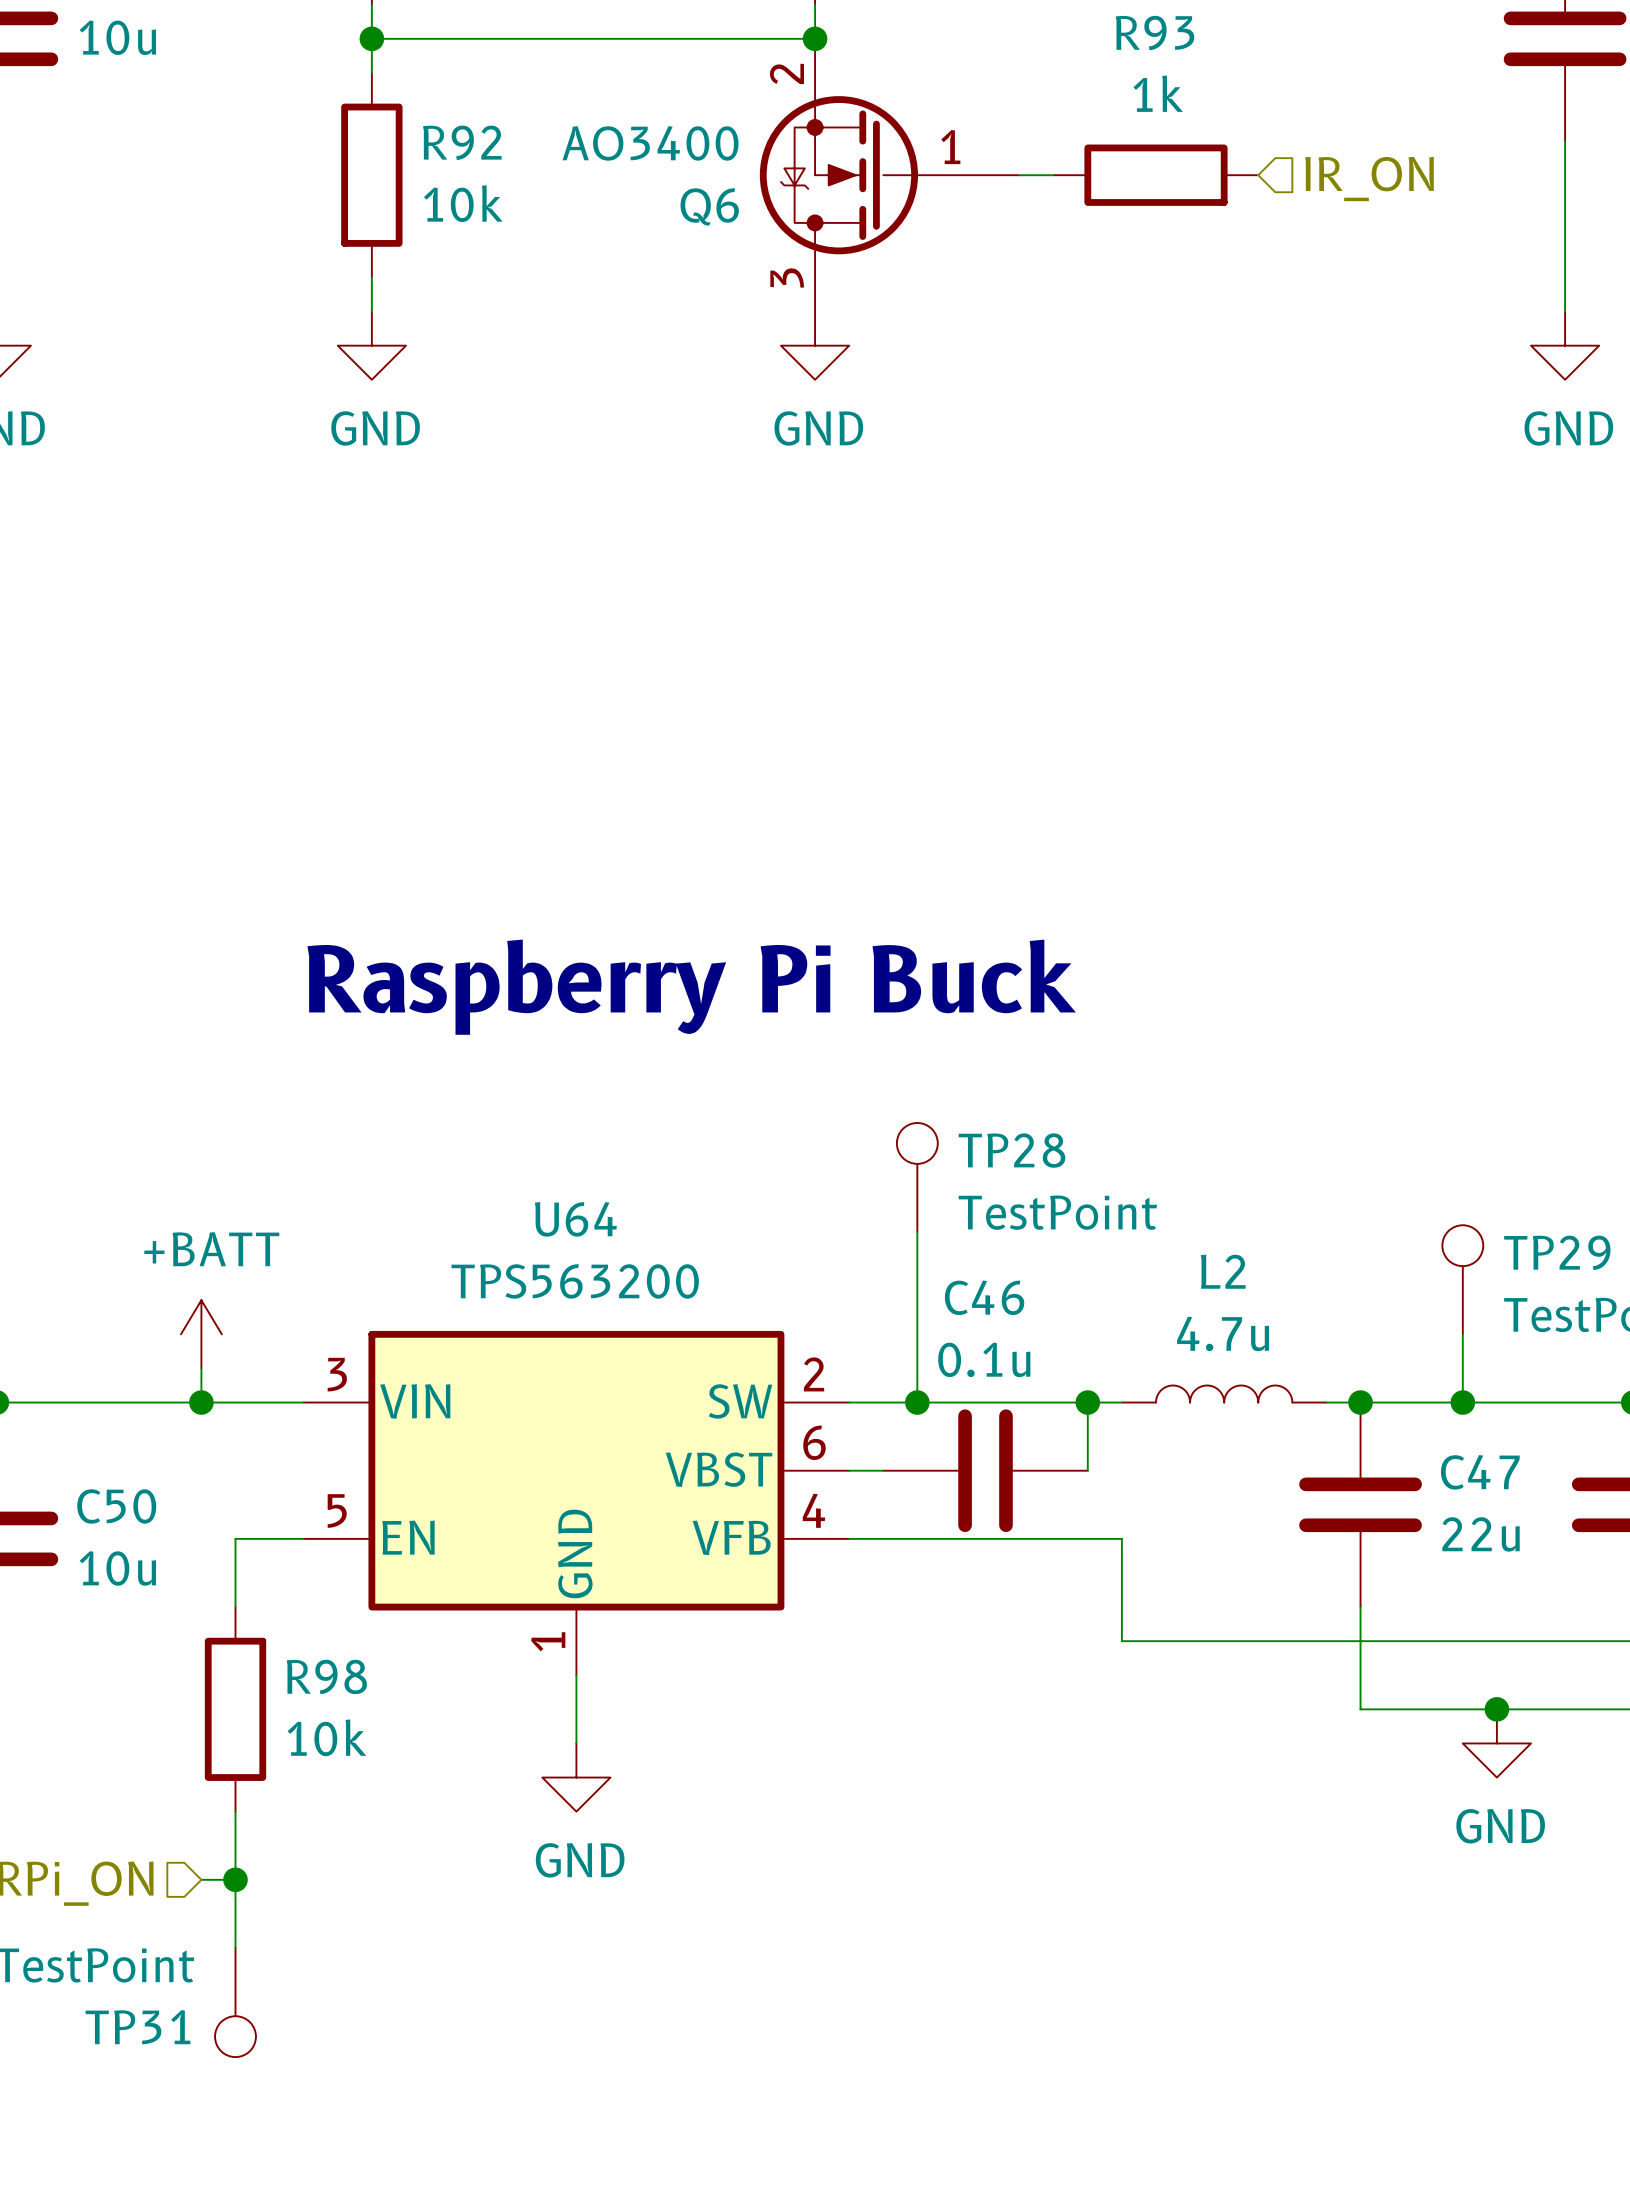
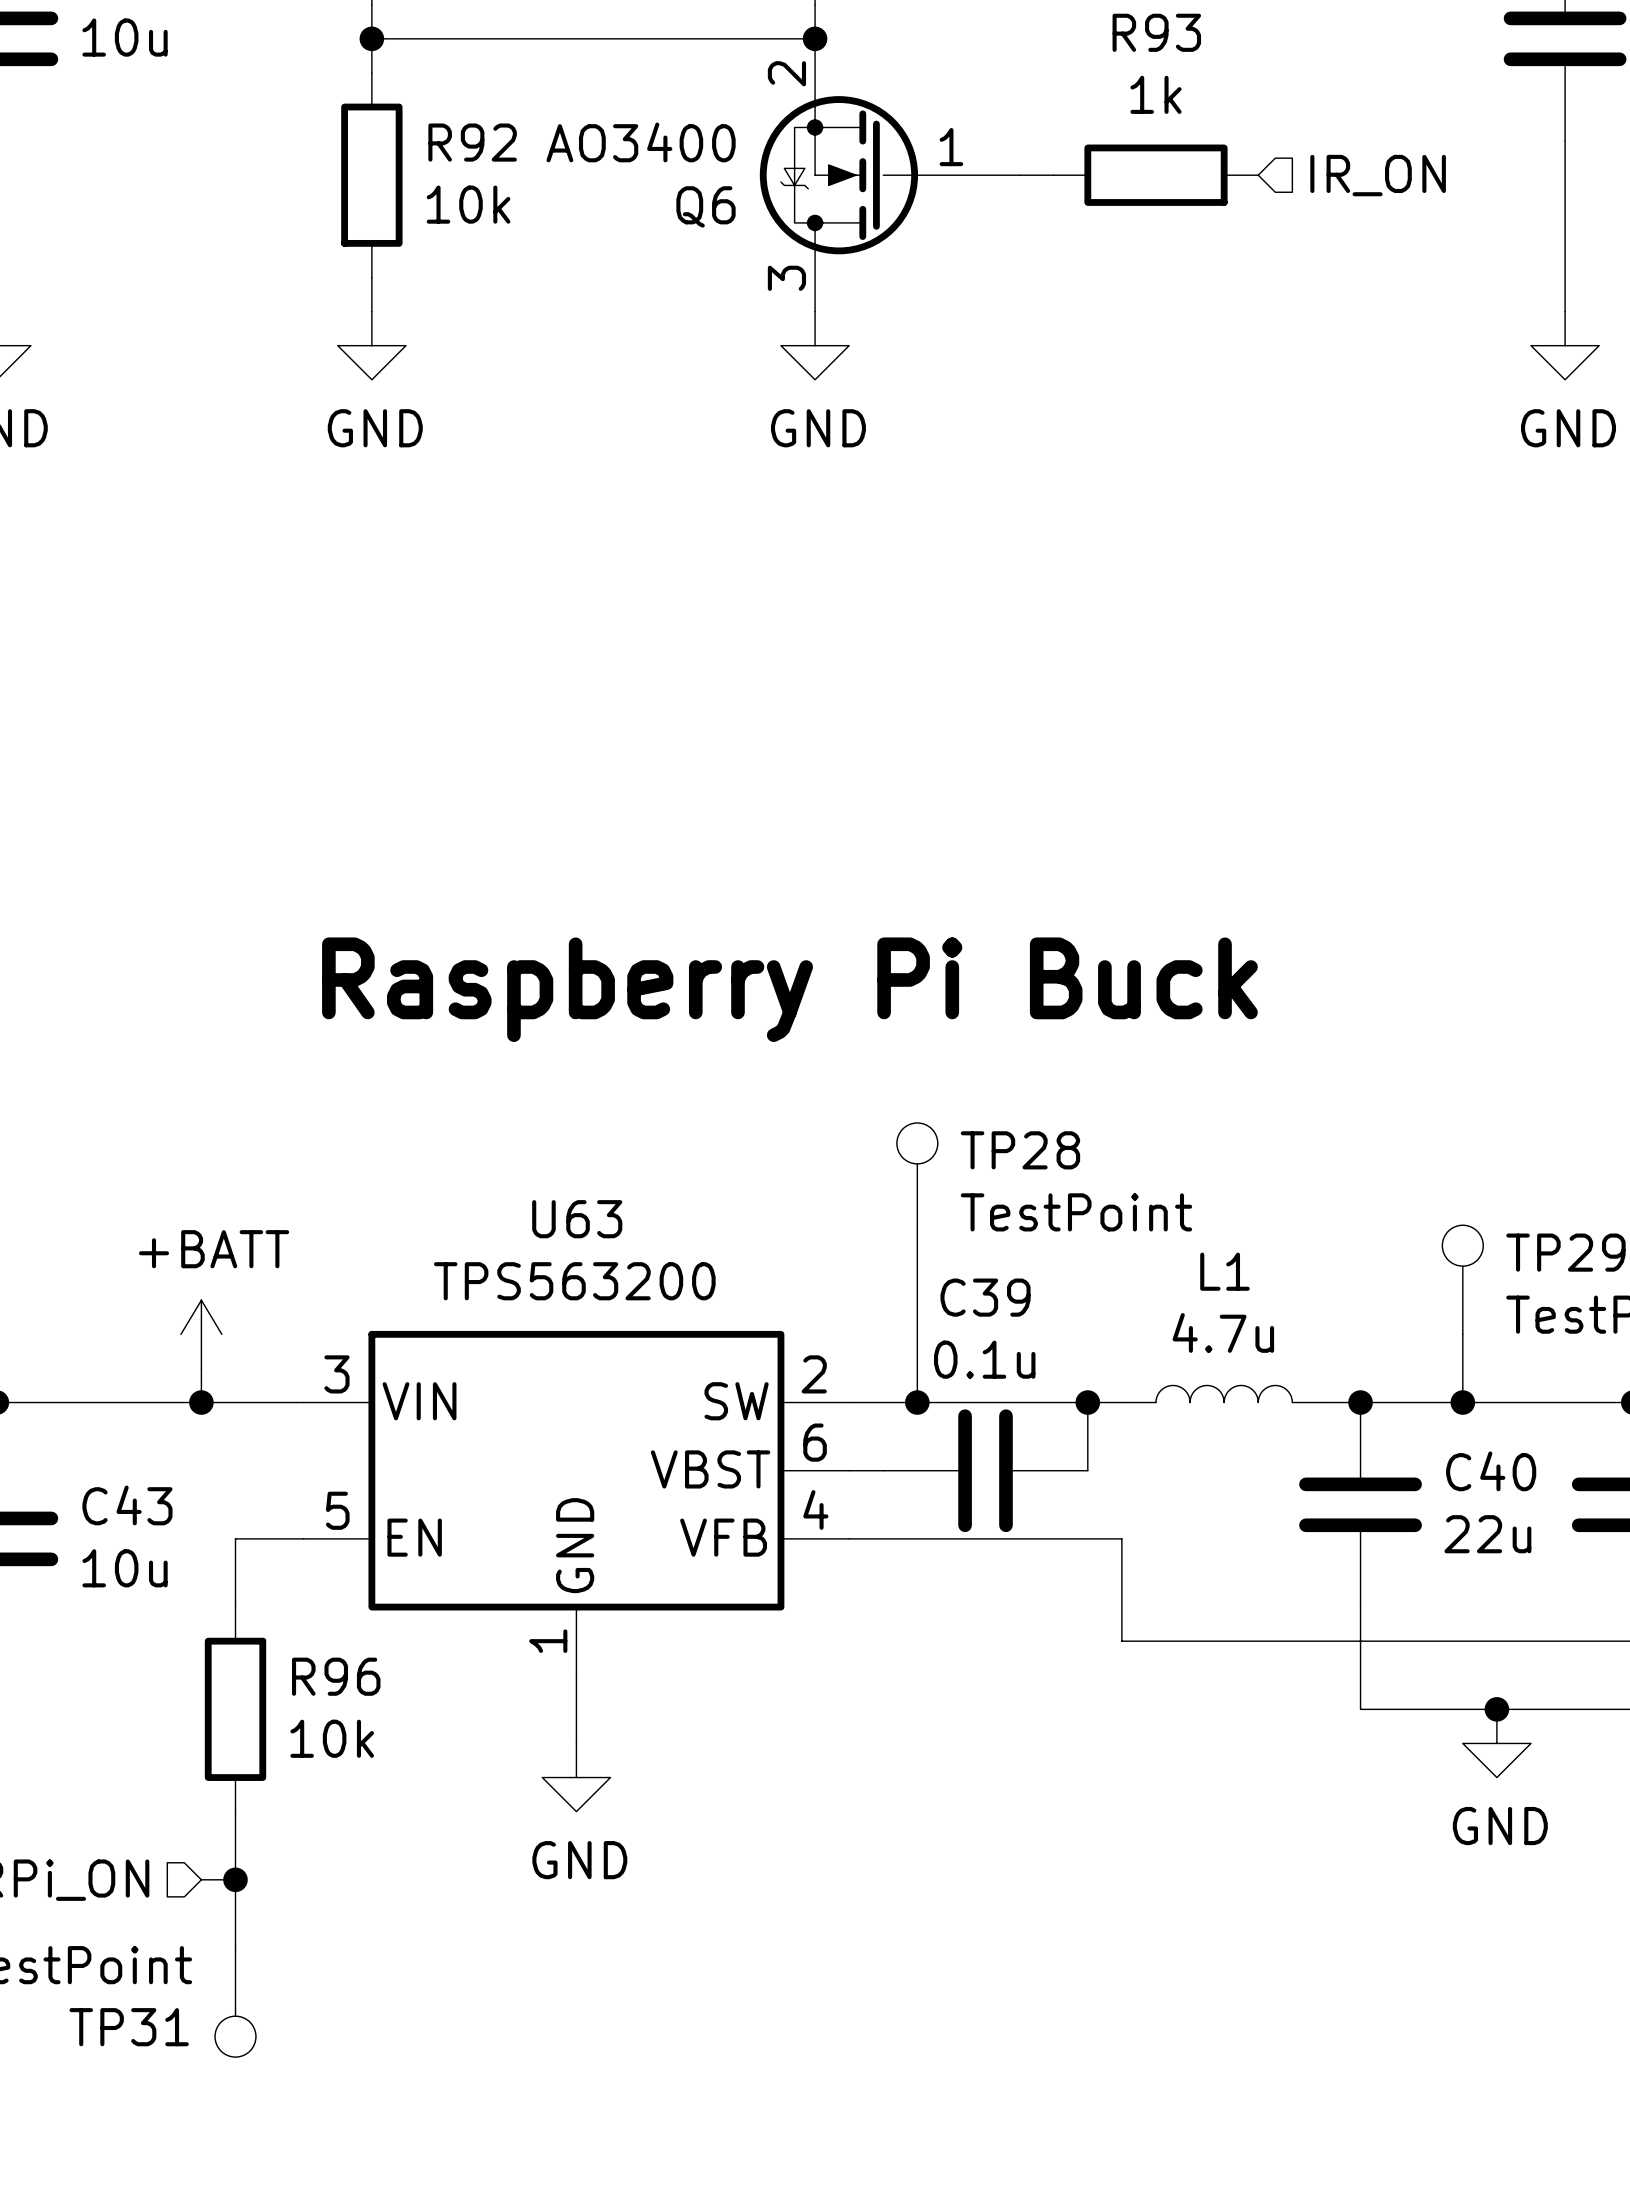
U64 name: U64 (575, 1219) -> U63 (577, 1219)
L2 name: L2 (1223, 1271) -> L1 (1224, 1271)
C46 name: C46 (984, 1297) -> C39 (985, 1297)
C47 name: C47 (1480, 1472) -> C40 (1491, 1471)
C50 name: C50 (116, 1506) -> C43 (127, 1505)
R98 name: R98 (326, 1676) -> R96 (336, 1676)

